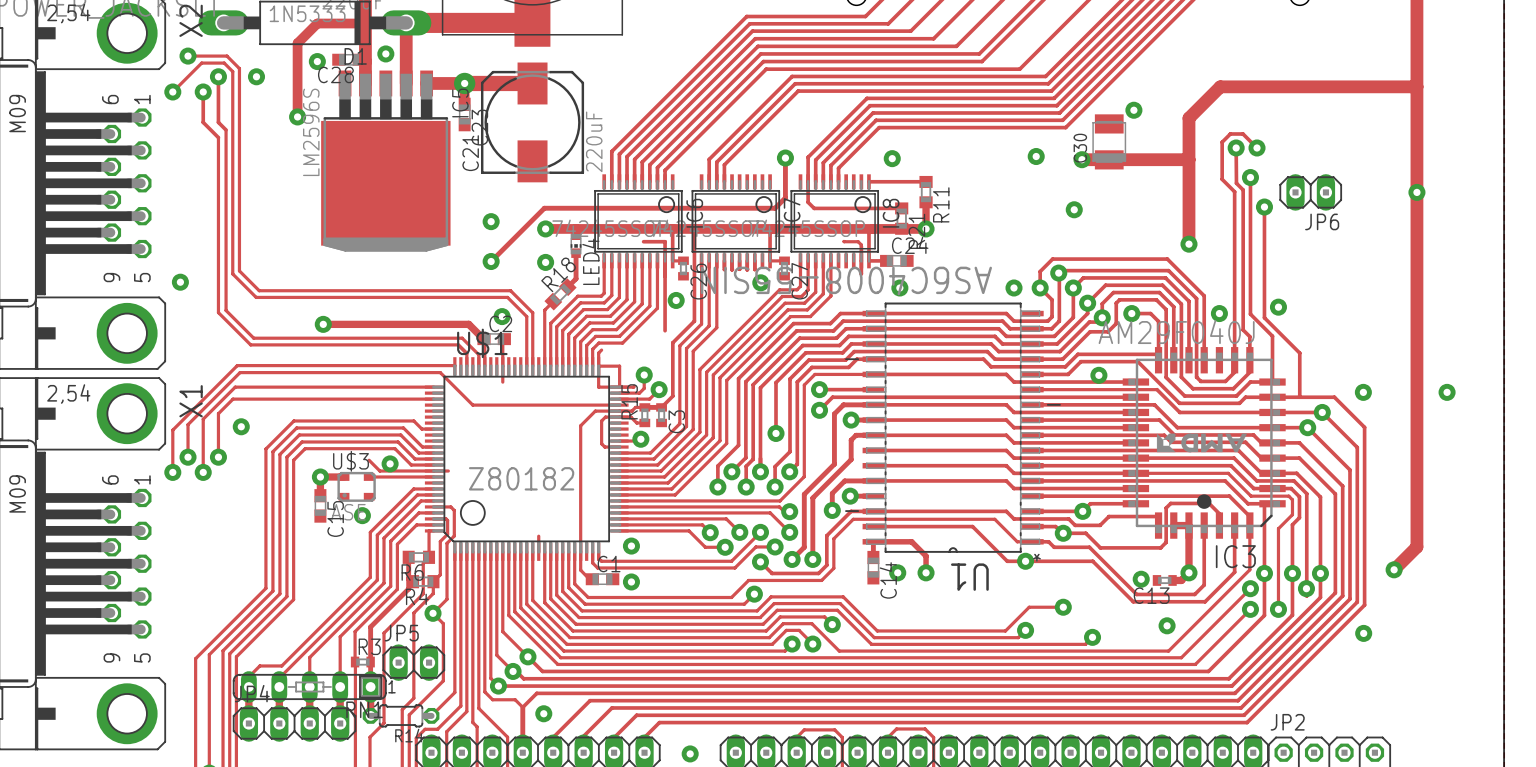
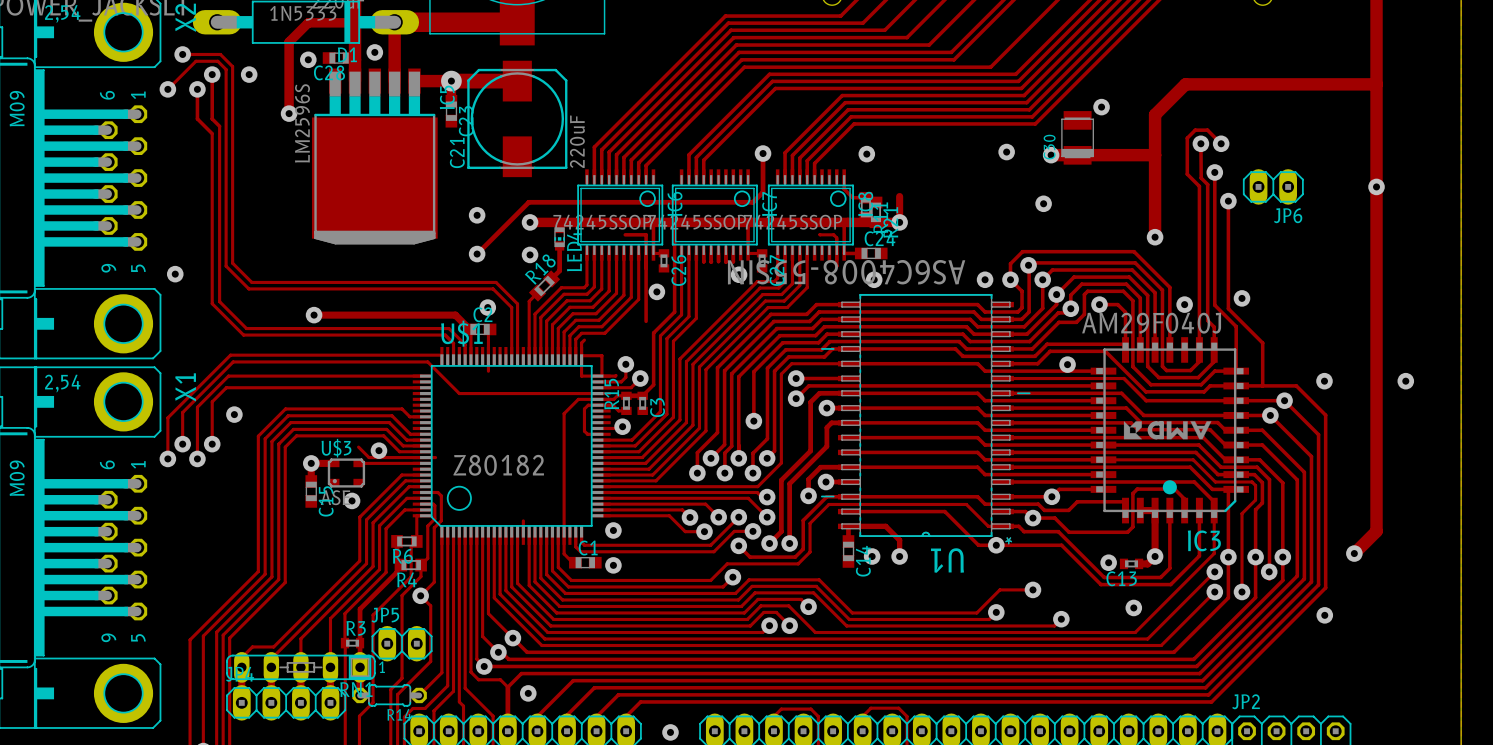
track: (808, 181) (808, 202) (814, 208) (901, 208) -> none
track: (868, 181) (925, 181) -> (844, 176) (844, 189) (852, 197) (865, 197)
R11 position: (926, 192) -> (865, 207)

